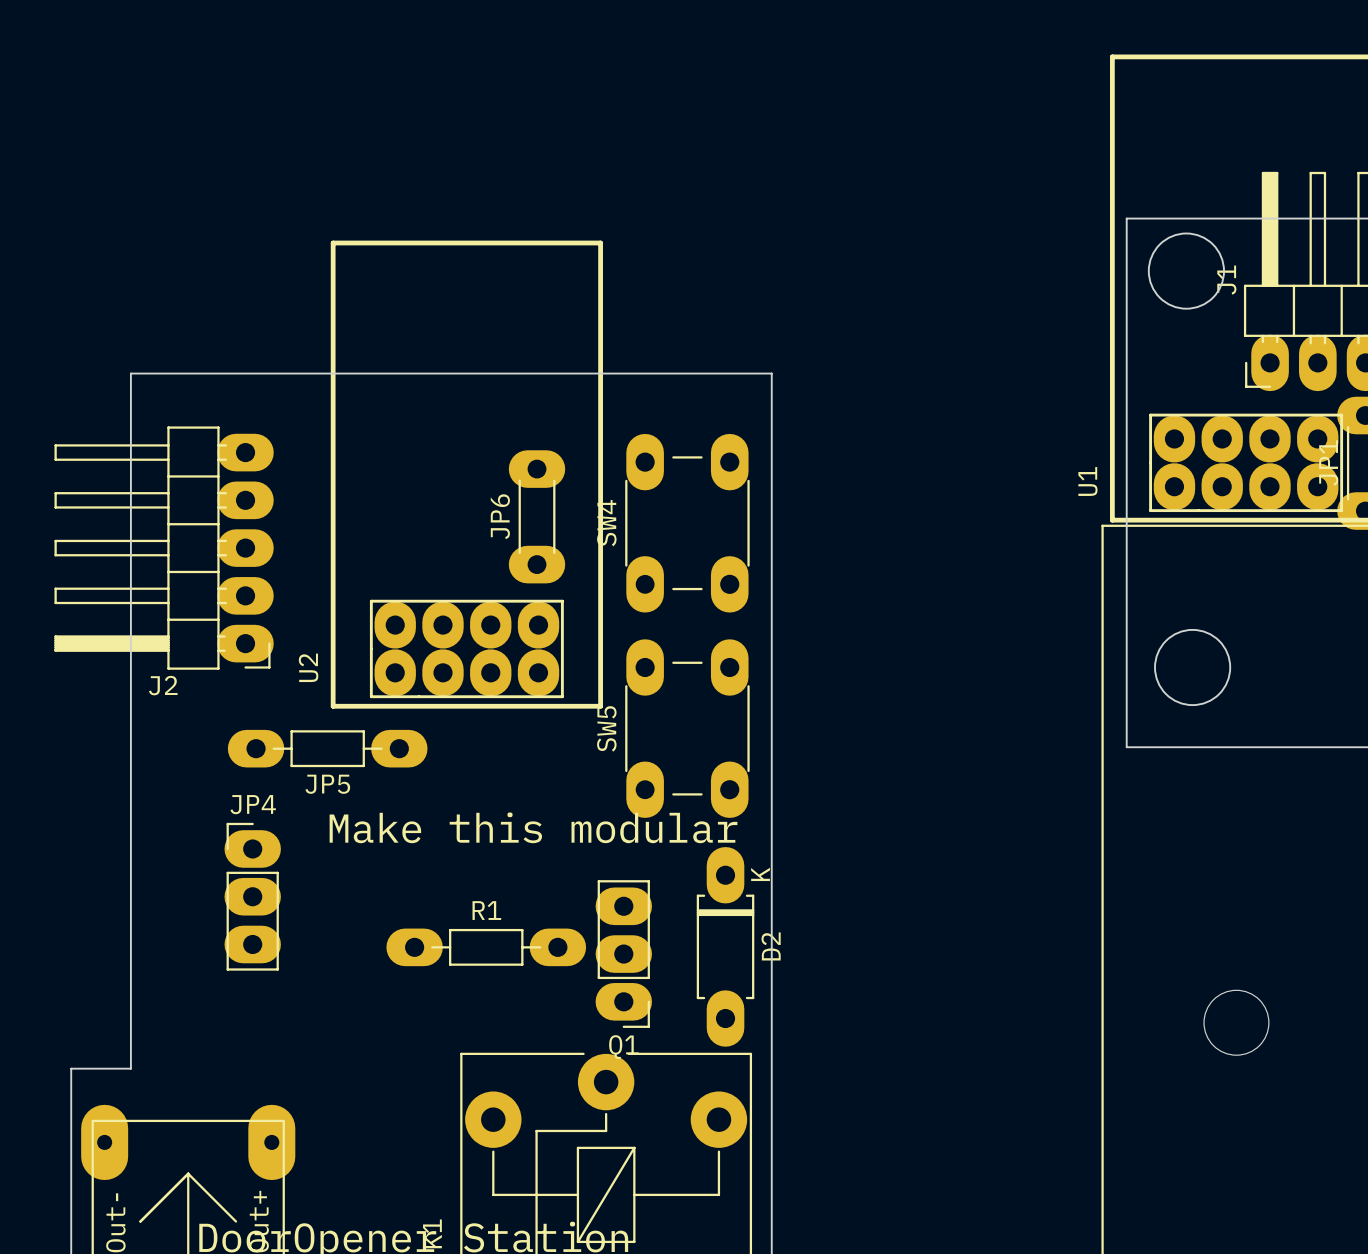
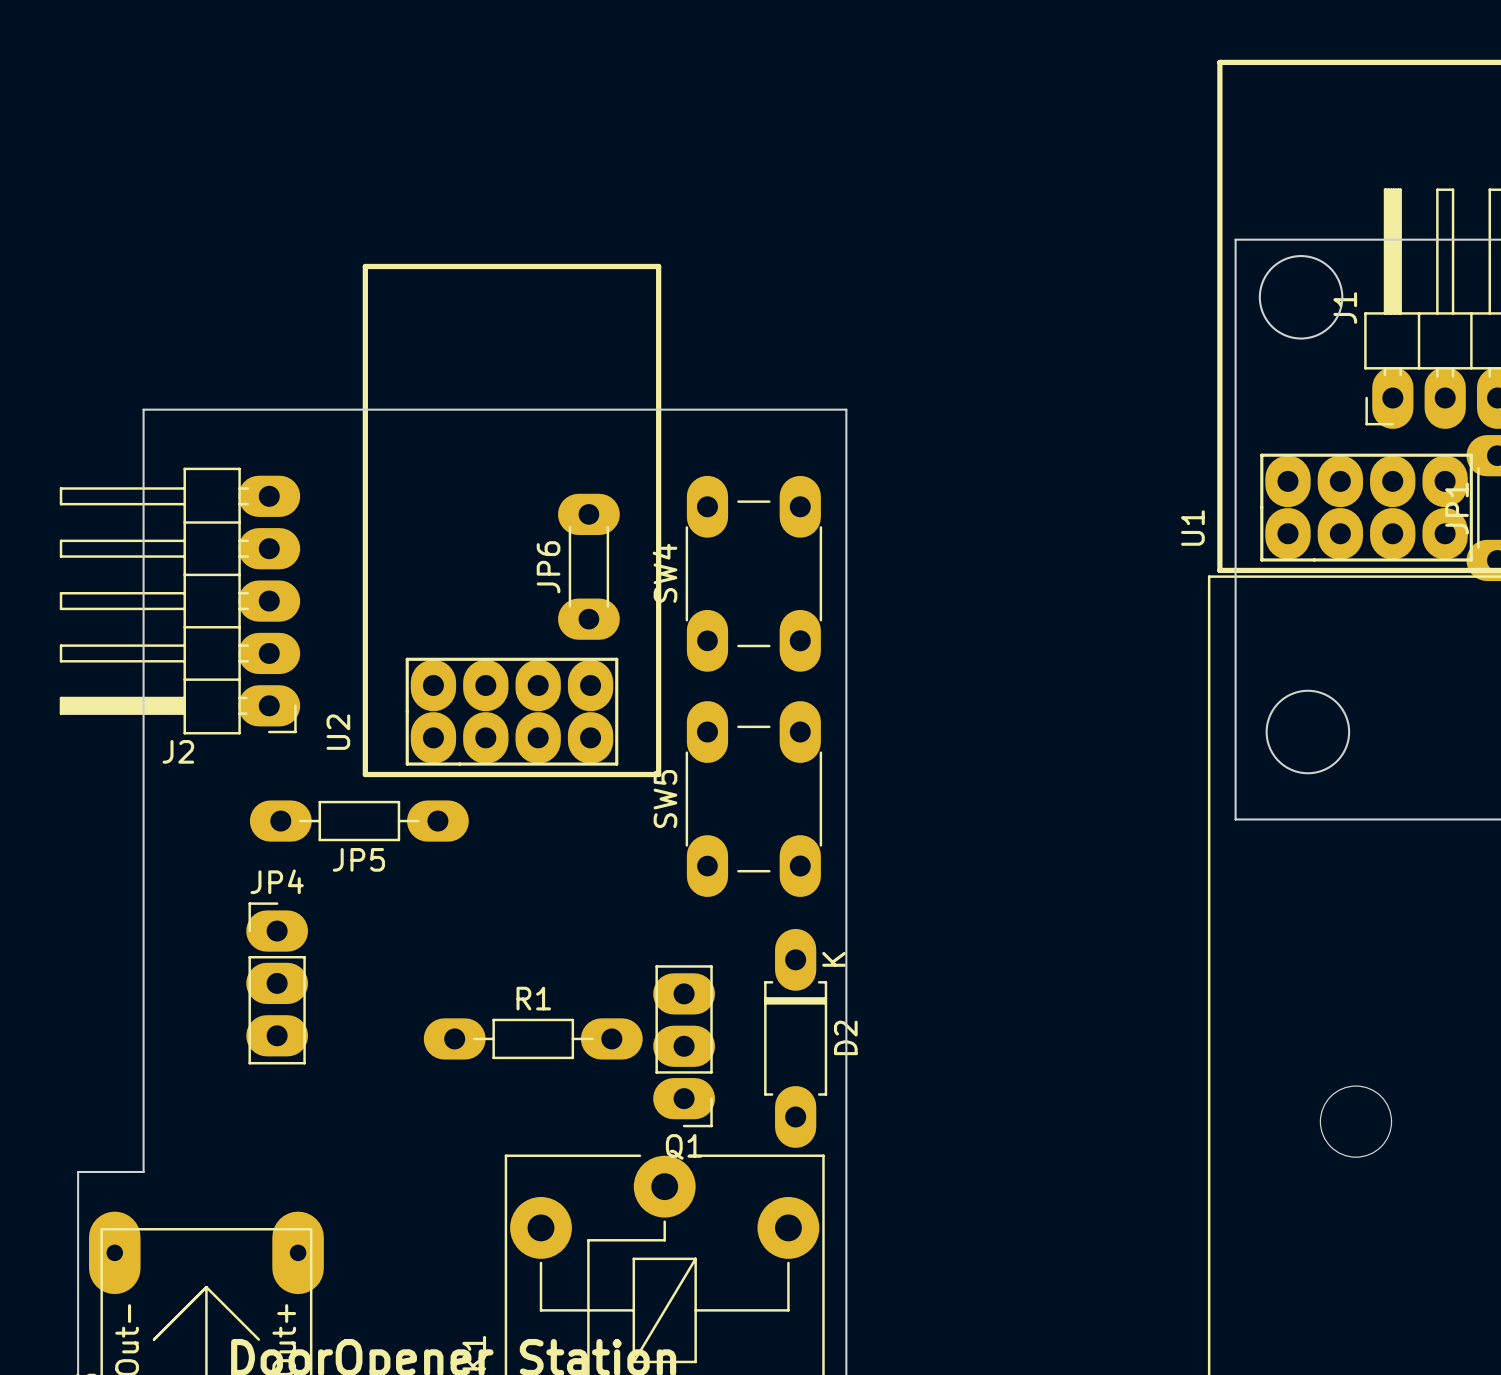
text: Make this modular (533, 827) -> none

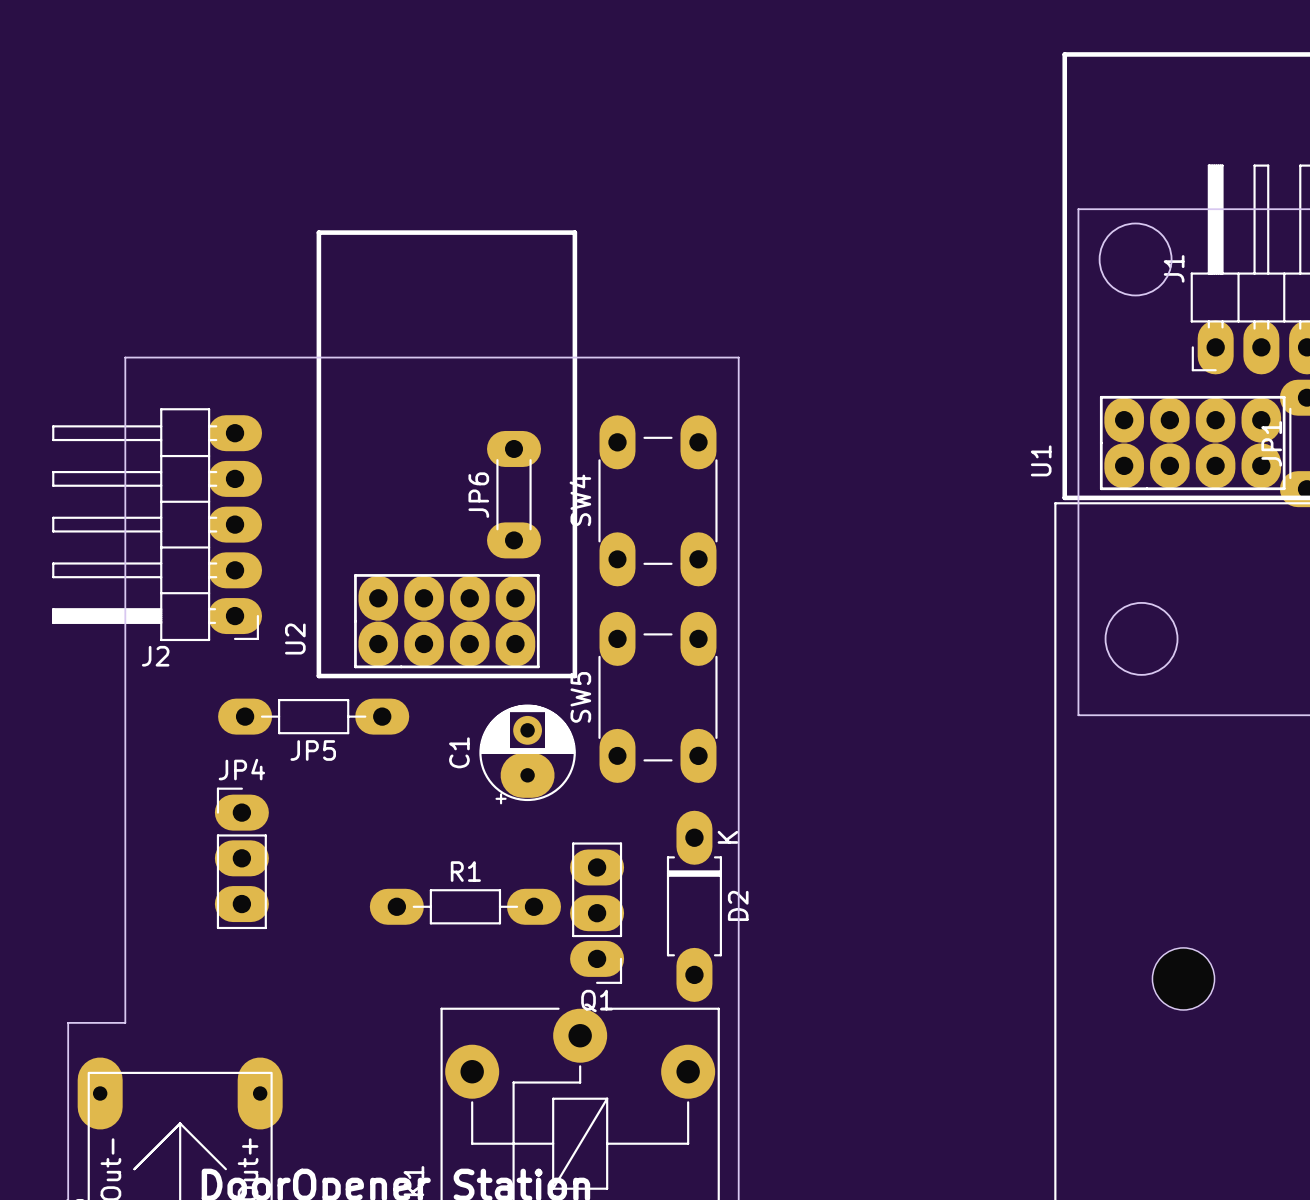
C1: none -> (527, 754)

